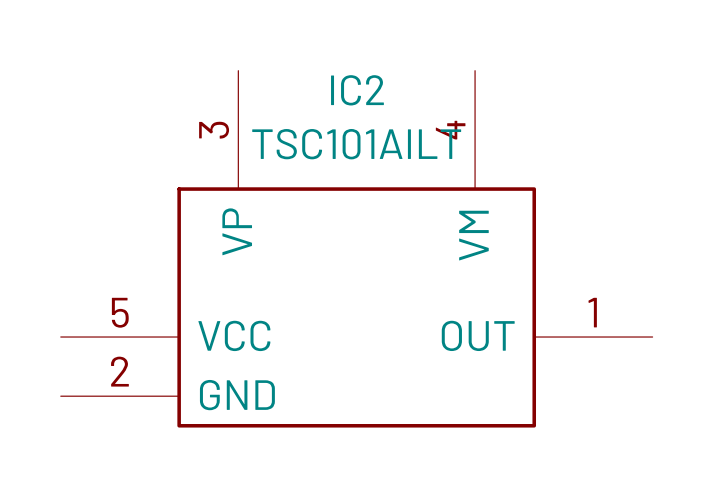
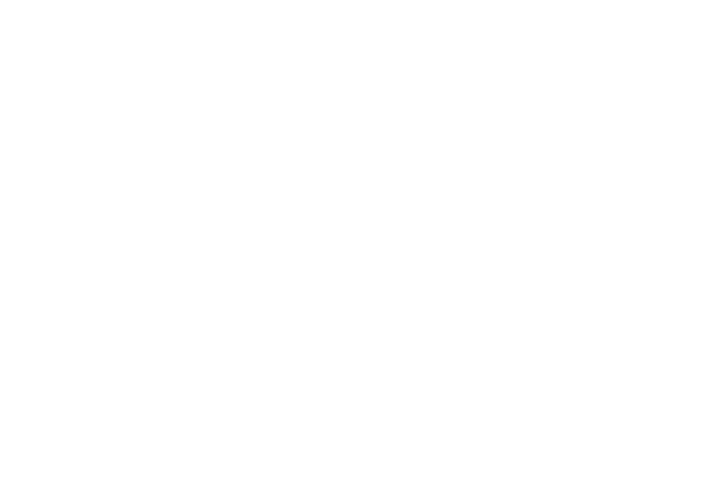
IC2: TSC101AILT (356, 249) -> none

